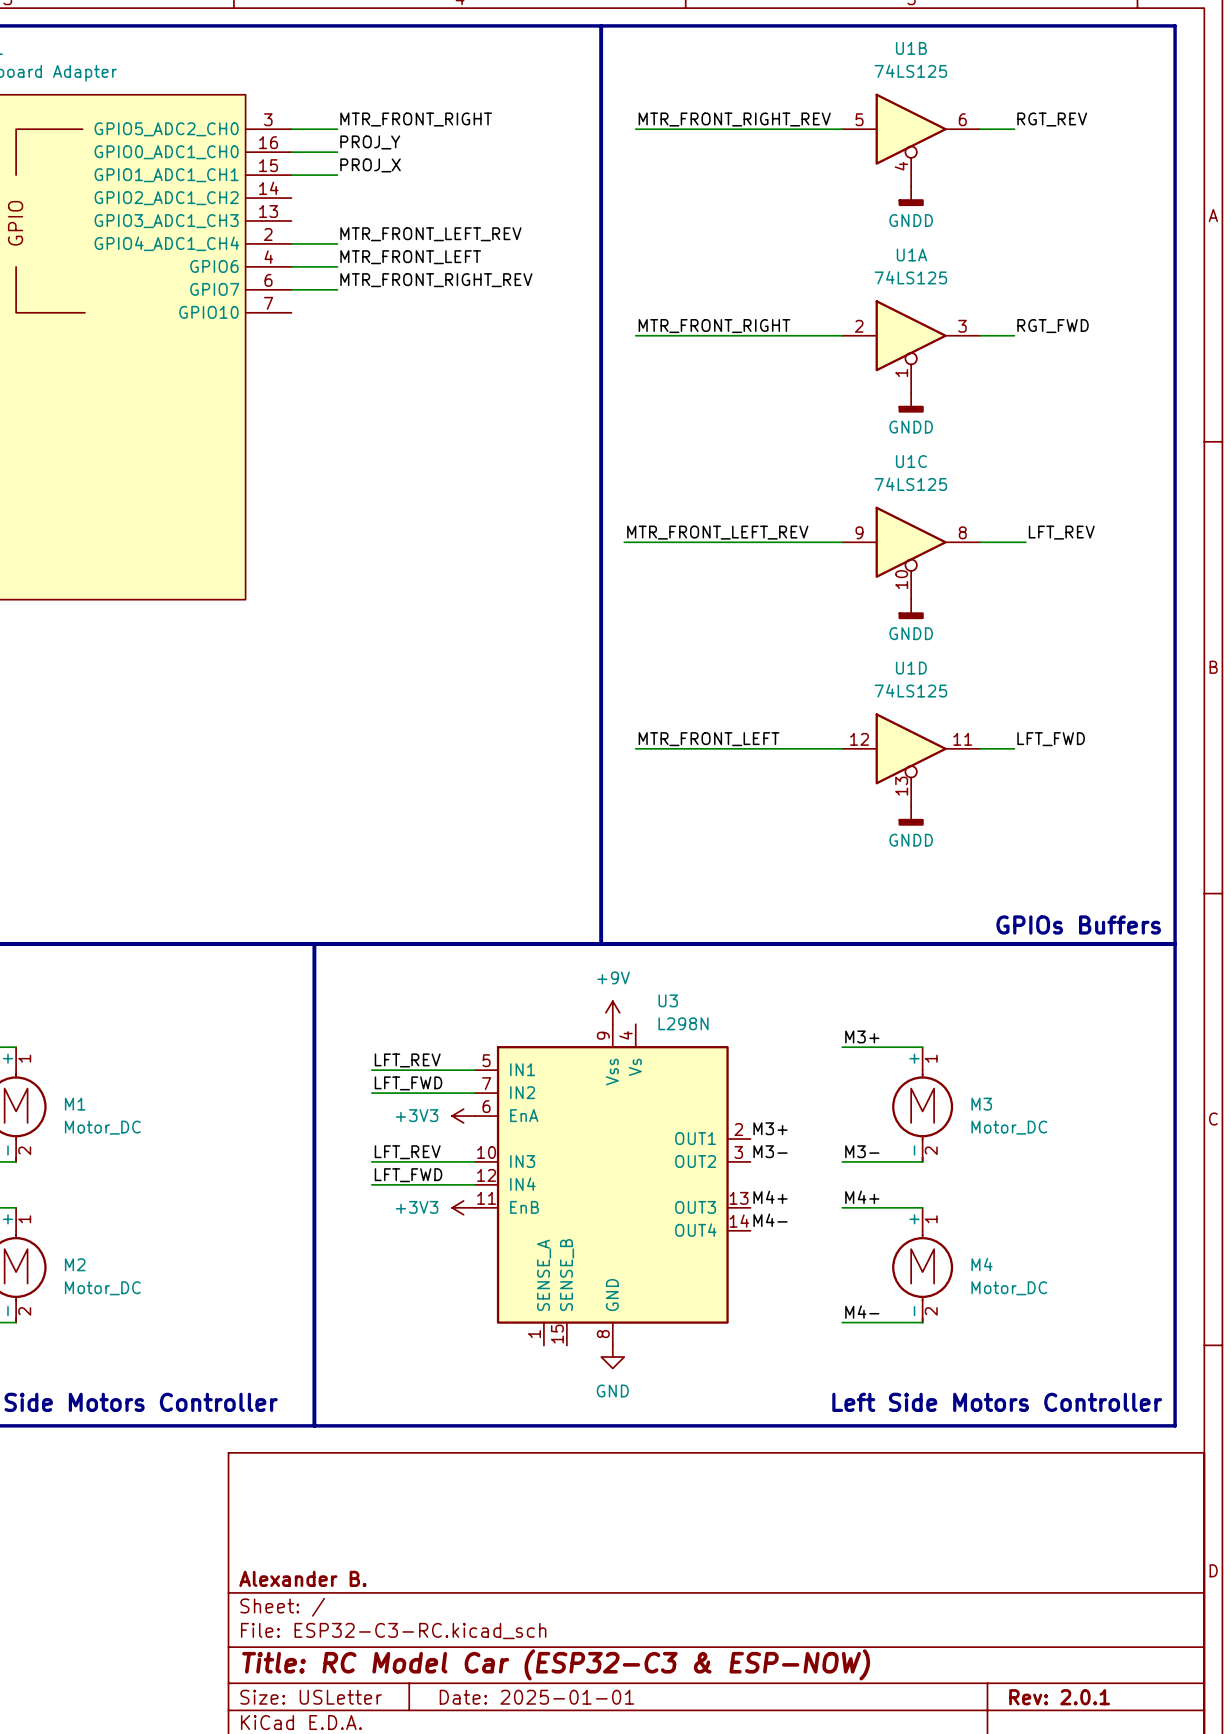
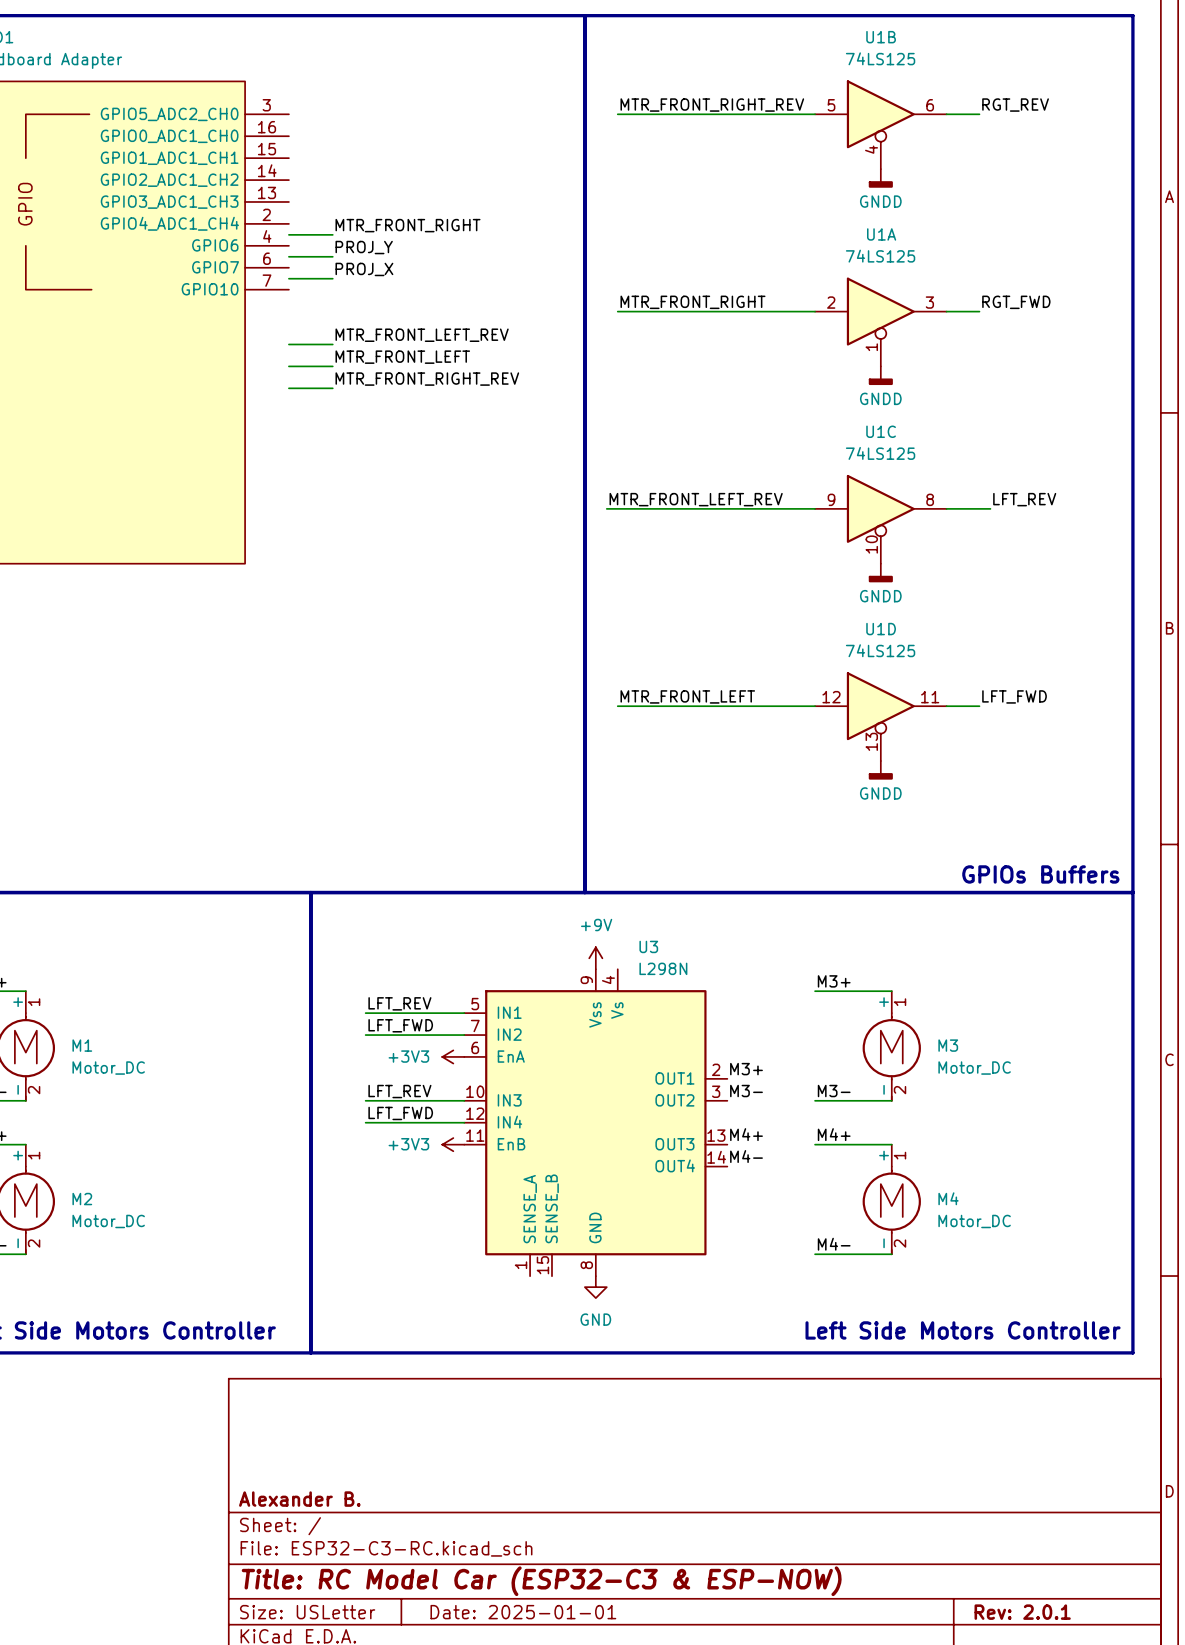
label position: MTR_FRONT_RIGHT (416, 119) -> MTR_FRONT_RIGHT (408, 225)
wire: (291, 129) (337, 129) -> (288, 234) (332, 234)
label position: PROJ_Y (370, 142) -> PROJ_Y (364, 247)
wire: (291, 152) (337, 152) -> (288, 256) (332, 256)
label position: PROJ_X (370, 165) -> PROJ_X (364, 269)
wire: (291, 175) (337, 175) -> (288, 278) (332, 278)
label position: MTR_FRONT_LEFT_REV (430, 234) -> MTR_FRONT_LEFT_REV (422, 335)
wire: (291, 243) (337, 243) -> (288, 344) (332, 344)
label position: MTR_FRONT_LEFT (410, 257) -> MTR_FRONT_LEFT (402, 357)
wire: (291, 266) (337, 266) -> (288, 366) (332, 366)
label position: MTR_FRONT_RIGHT_REV (436, 280) -> MTR_FRONT_RIGHT_REV (427, 379)
wire: (291, 289) (337, 289) -> (288, 388) (332, 388)

